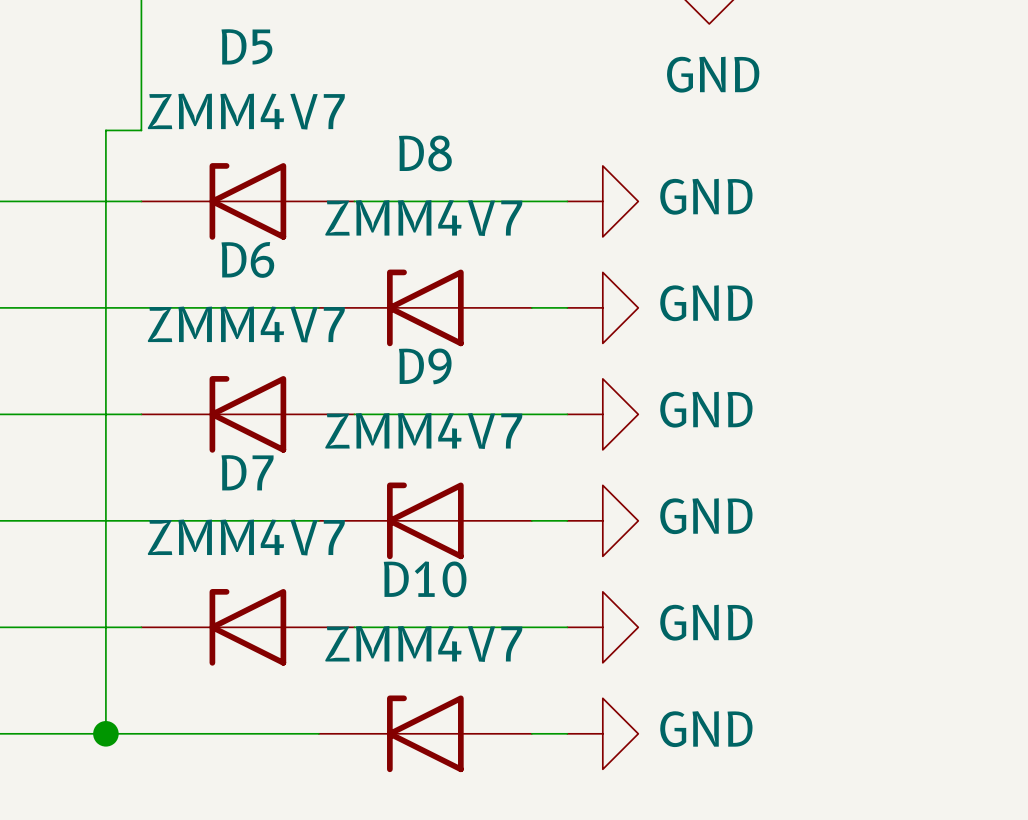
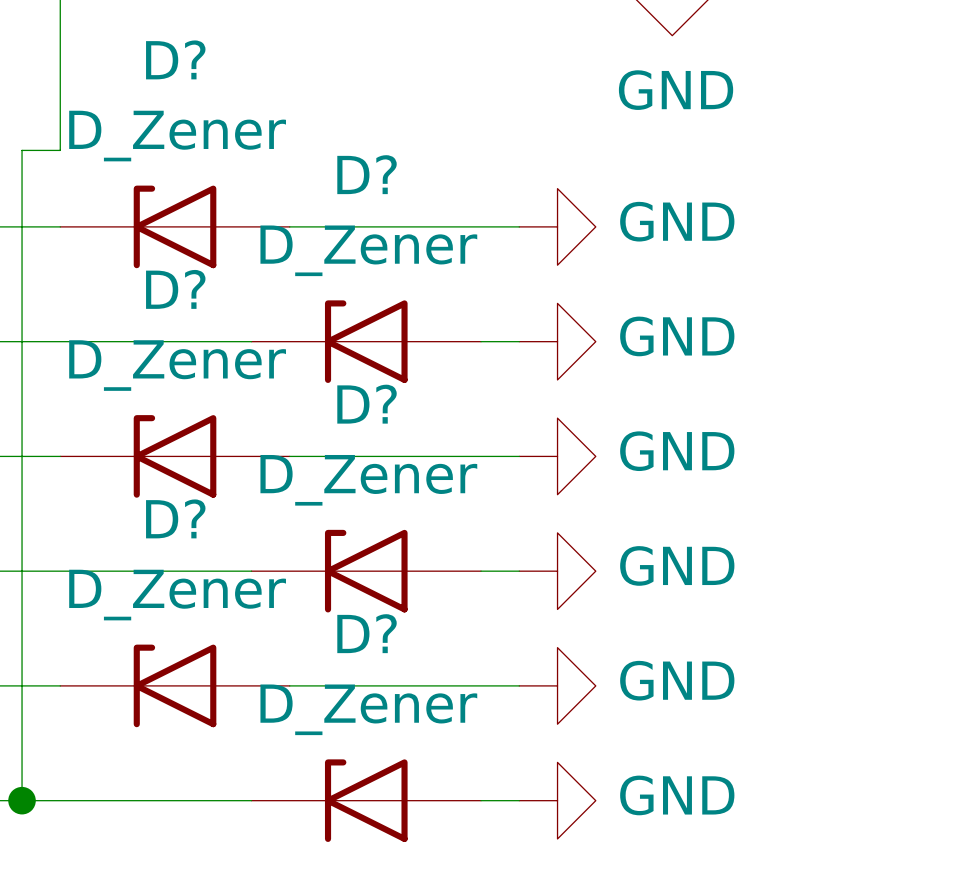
D5 name: D5 (246, 46) -> D? (175, 59)
D5 value: ZMM4V7 (246, 111) -> D_Zener (177, 136)
D8 name: D8 (425, 153) -> D? (367, 174)
D8 value: ZMM4V7 (423, 218) -> D_Zener (368, 250)
D6 name: D6 (247, 259) -> D? (175, 289)
D6 value: ZMM4V7 (246, 324) -> D_Zener (177, 365)
D9 name: D9 (425, 366) -> D? (367, 404)
D9 value: ZMM4V7 (423, 431) -> D_Zener (368, 480)
D7 name: D7 (247, 472) -> D? (175, 518)
D7 value: ZMM4V7 (246, 537) -> D_Zener (177, 595)
D10 name: D10 (425, 579) -> D? (367, 633)
D10 value: ZMM4V7 (423, 643) -> D_Zener (368, 709)

